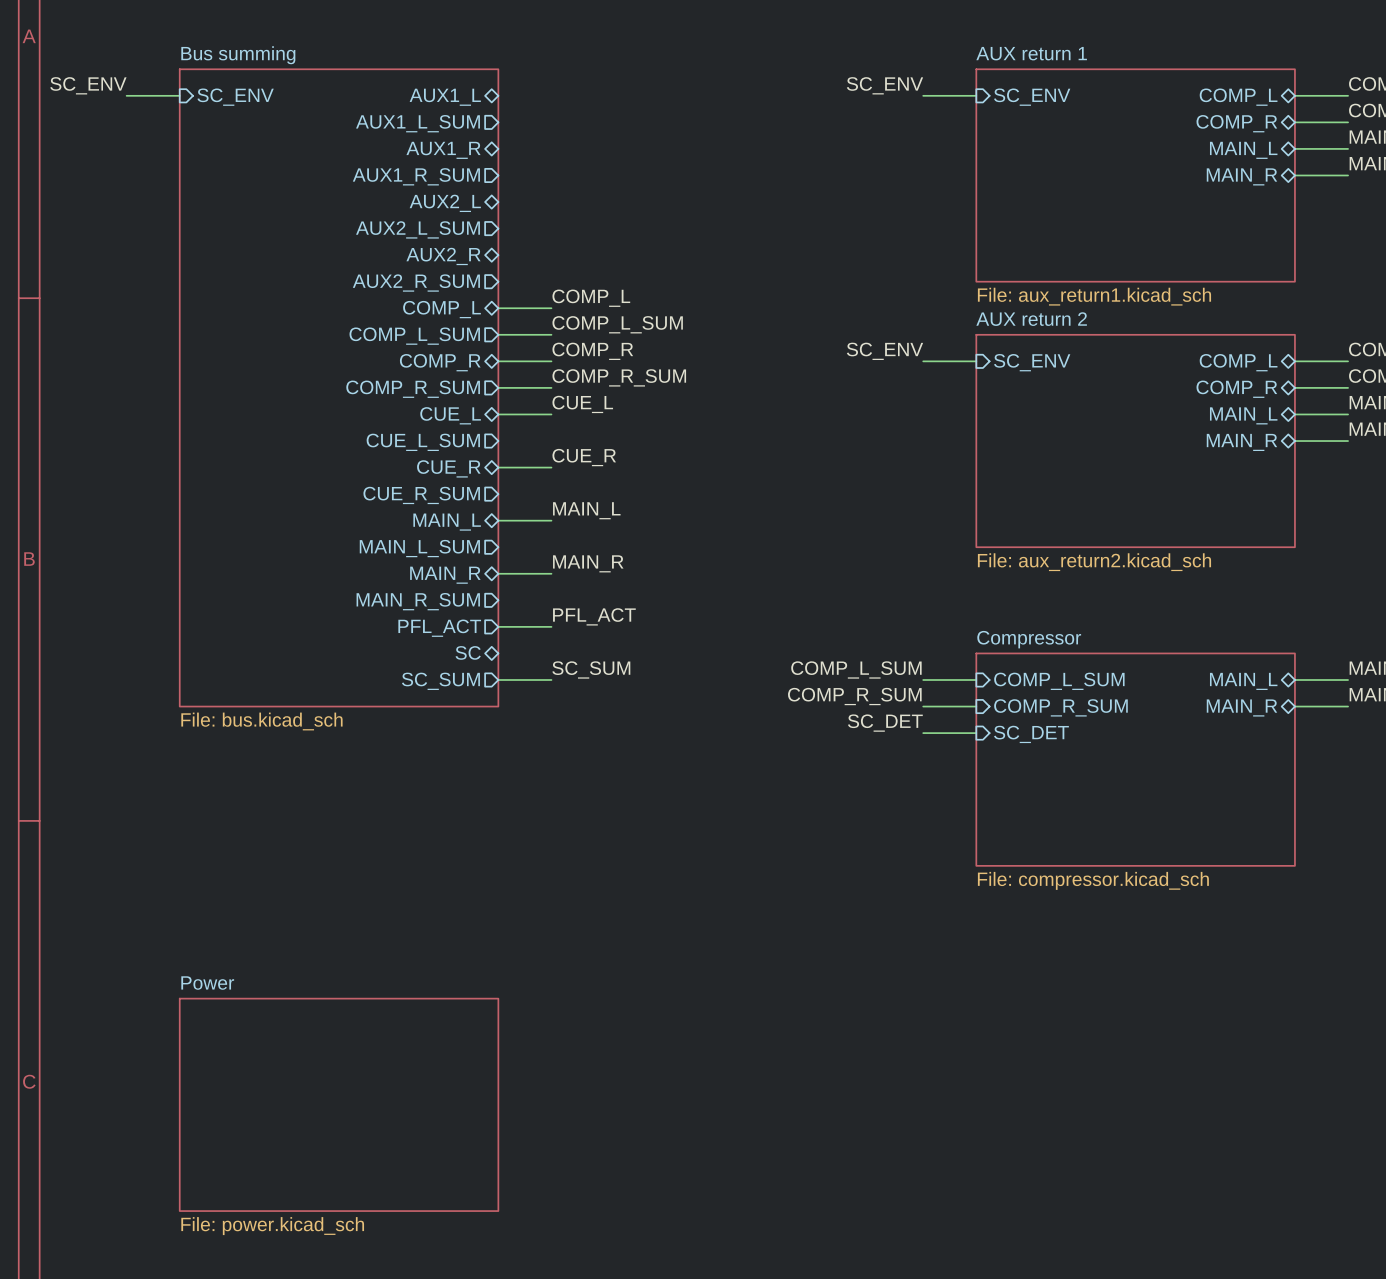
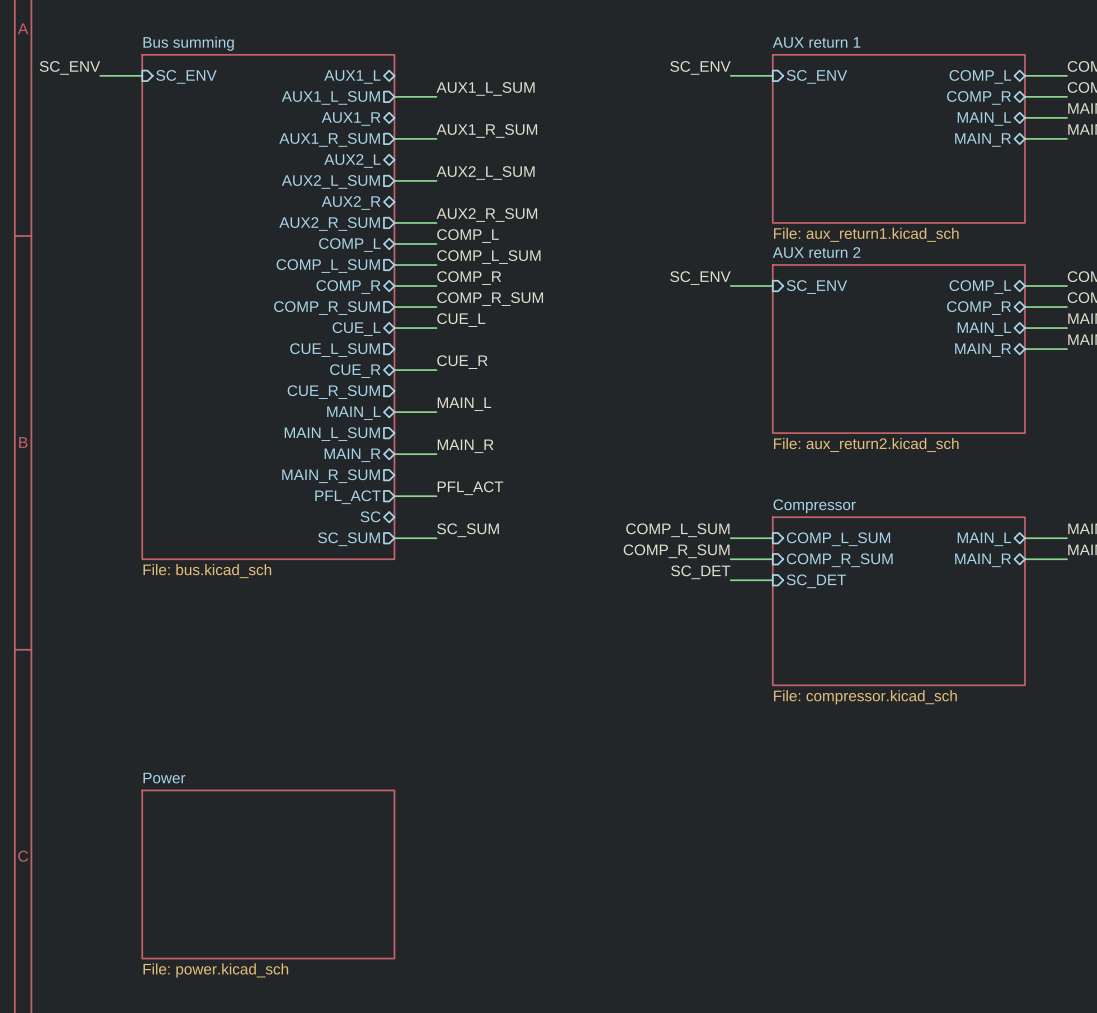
label: none -> AUX1_L_SUM (485, 88)
wire: none -> (394, 96) (436, 96)
label: none -> AUX1_R_SUM (486, 130)
wire: none -> (394, 138) (436, 138)
label: none -> AUX2_L_SUM (485, 172)
wire: none -> (394, 180) (436, 180)
label: none -> AUX2_R_SUM (486, 215)
wire: none -> (394, 222) (436, 222)

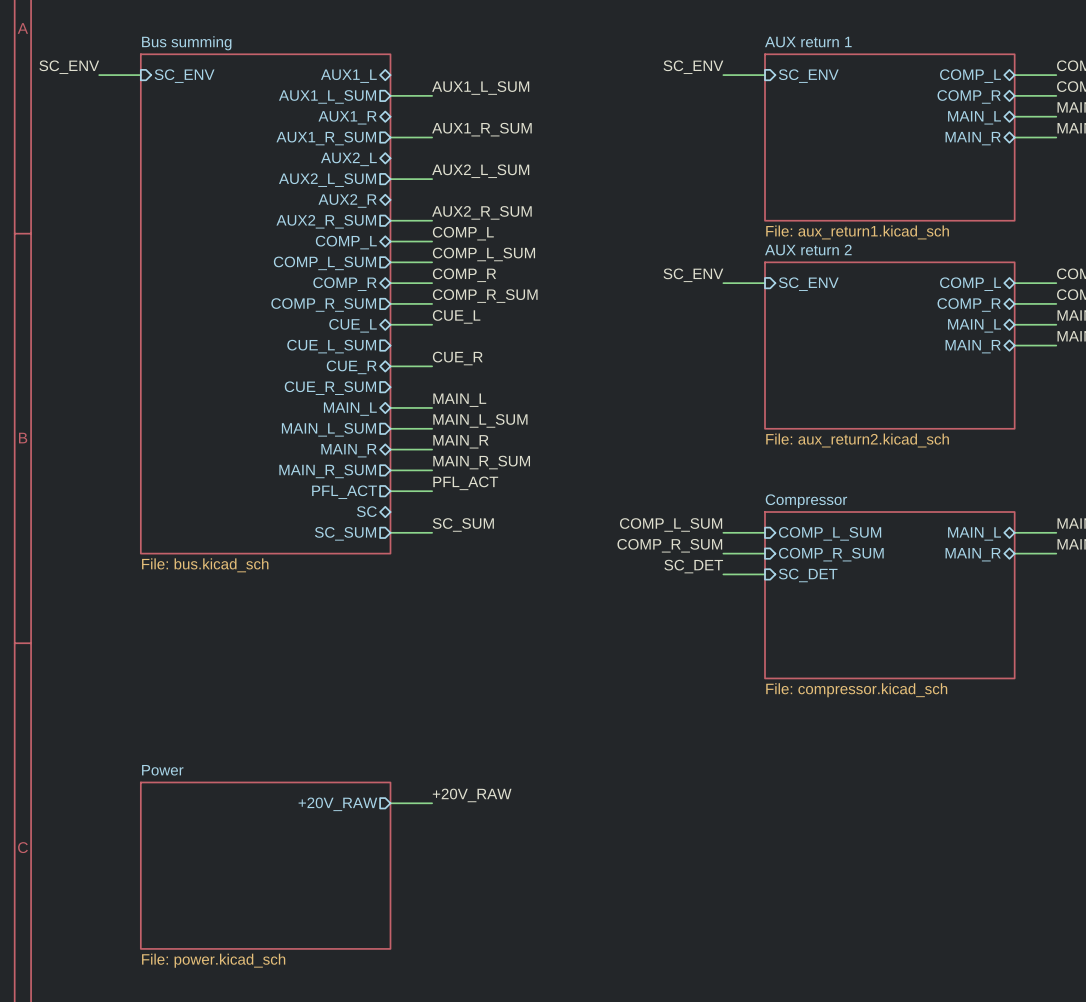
label: none -> MAIN_L_SUM (480, 420)
wire: none -> (390, 428) (432, 428)
label: none -> MAIN_R_SUM (481, 462)
wire: none -> (390, 470) (432, 470)
label: none -> +20V_RAW (472, 795)
wire: none -> (390, 803) (432, 803)
sheet pin: none -> +20V_RAW (337, 804)

